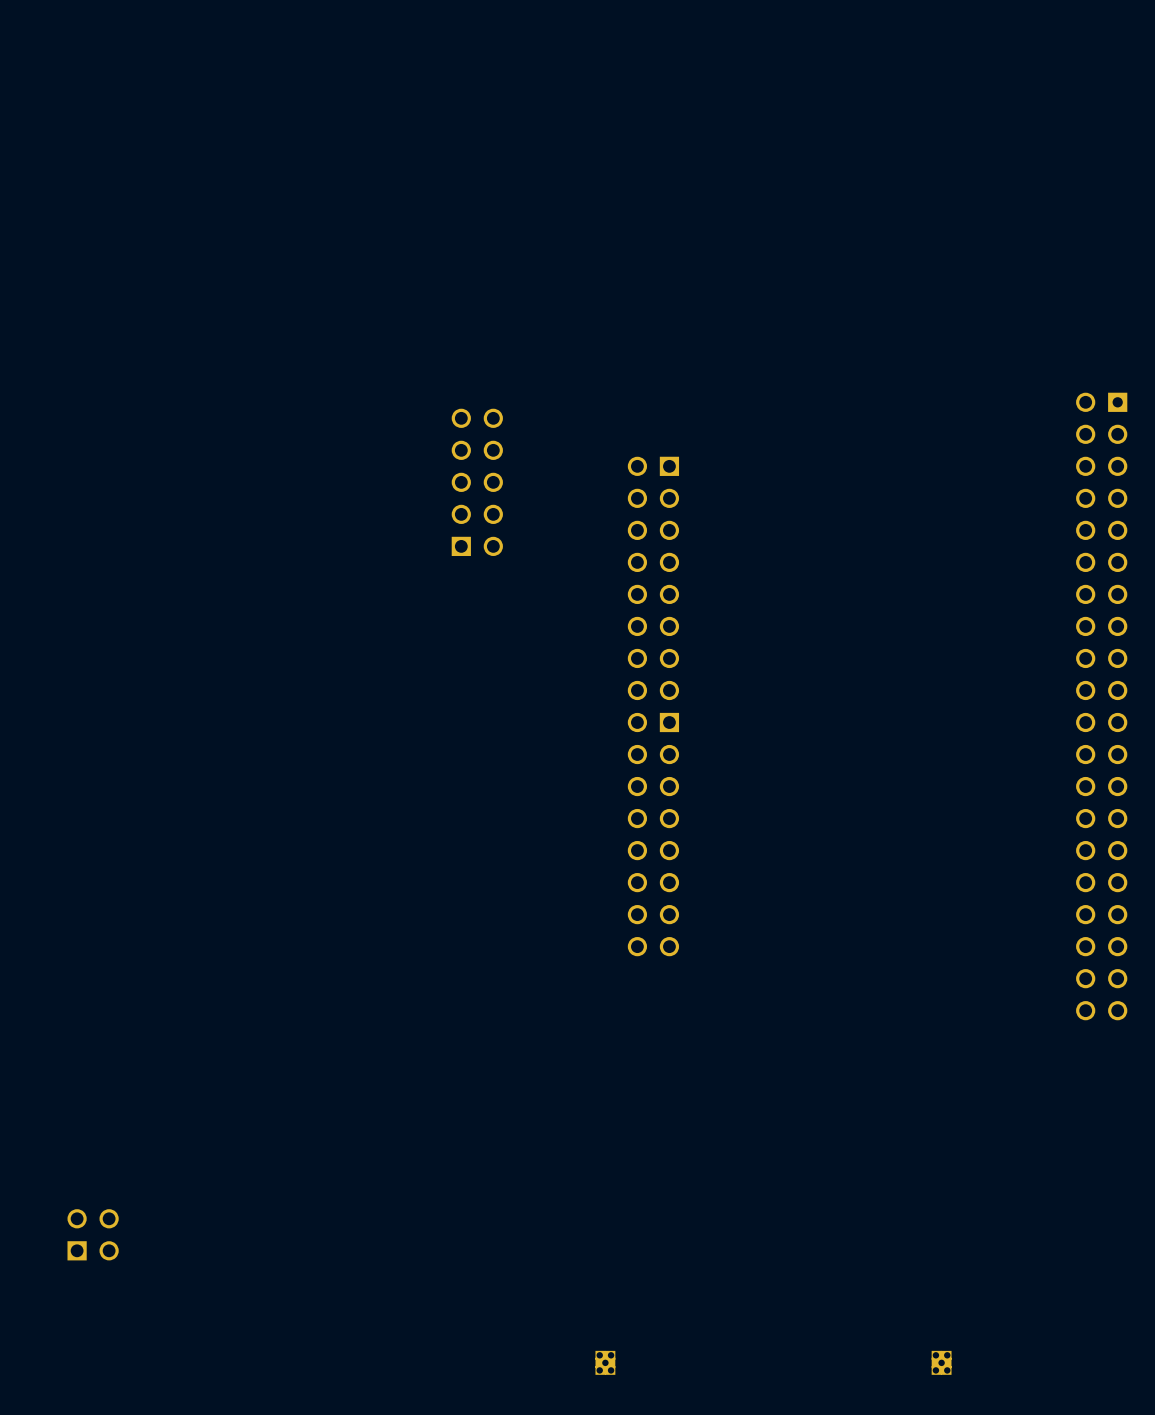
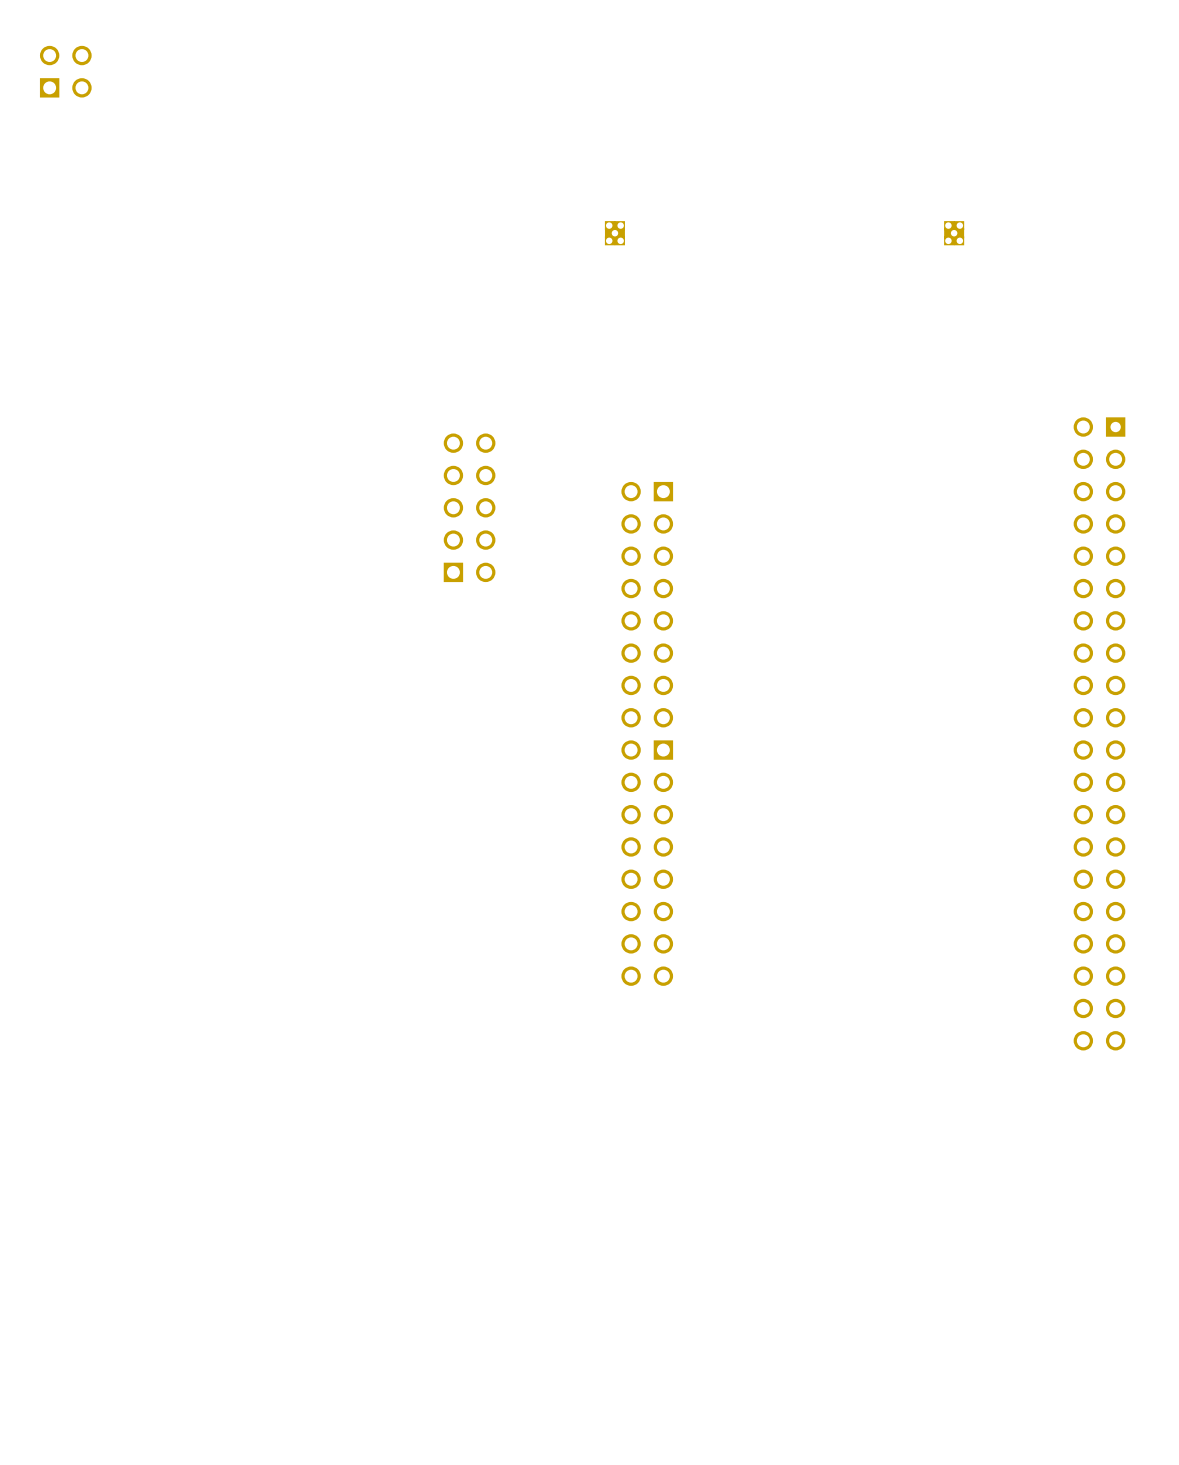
part: none -> (65, 71)
part: none -> (614, 233)
part: none -> (954, 233)
part: (93, 1234) -> none
part: (605, 1362) -> none
part: (941, 1362) -> none

